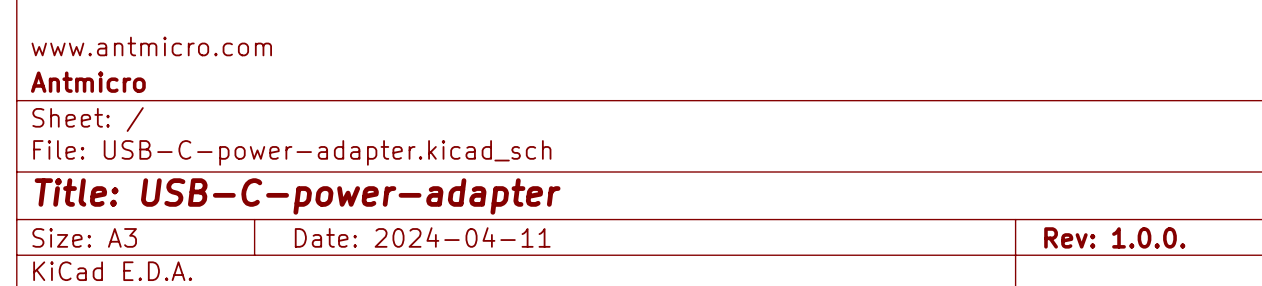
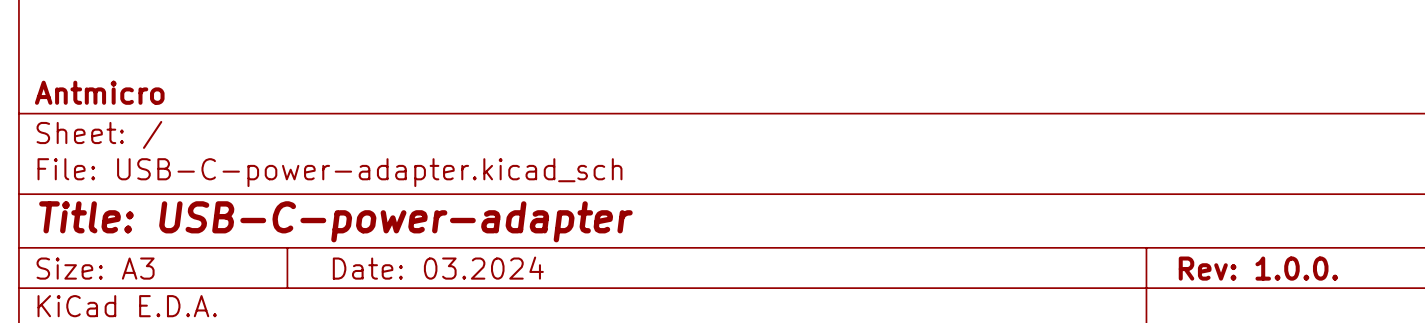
title block: www.antmicro.com (151, 46) -> none
title block: Date: 2024-04-11 (422, 237) -> Date: 03.2024 (438, 268)

